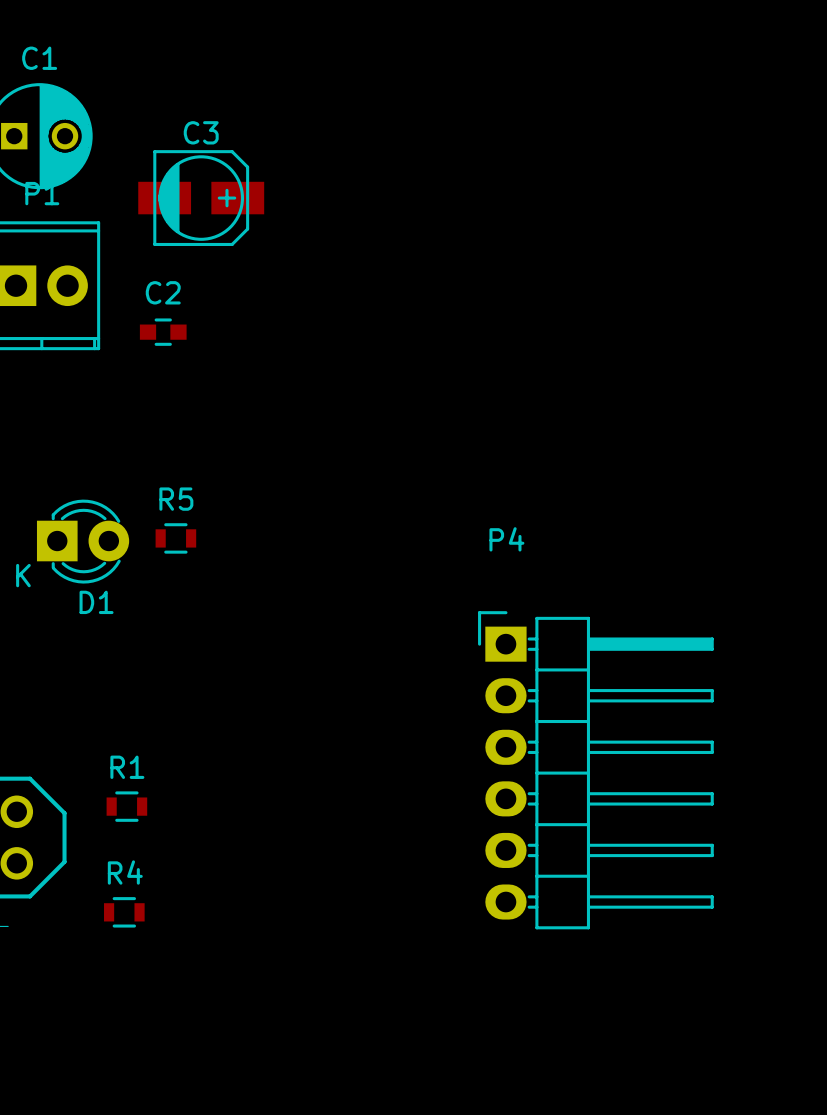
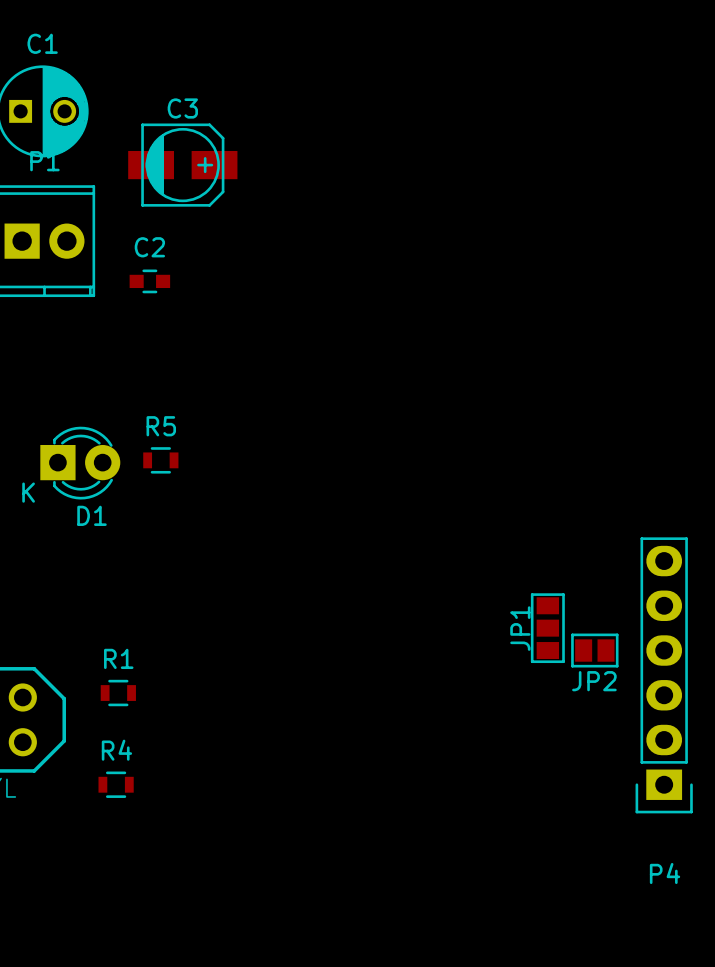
P4 name position: P4 (506, 539) -> P4 (665, 873)
P4 footprint: [478, 611, 714, 930] -> [635, 537, 693, 814]
JP1: none -> (547, 628)
JP2: none -> (594, 650)

